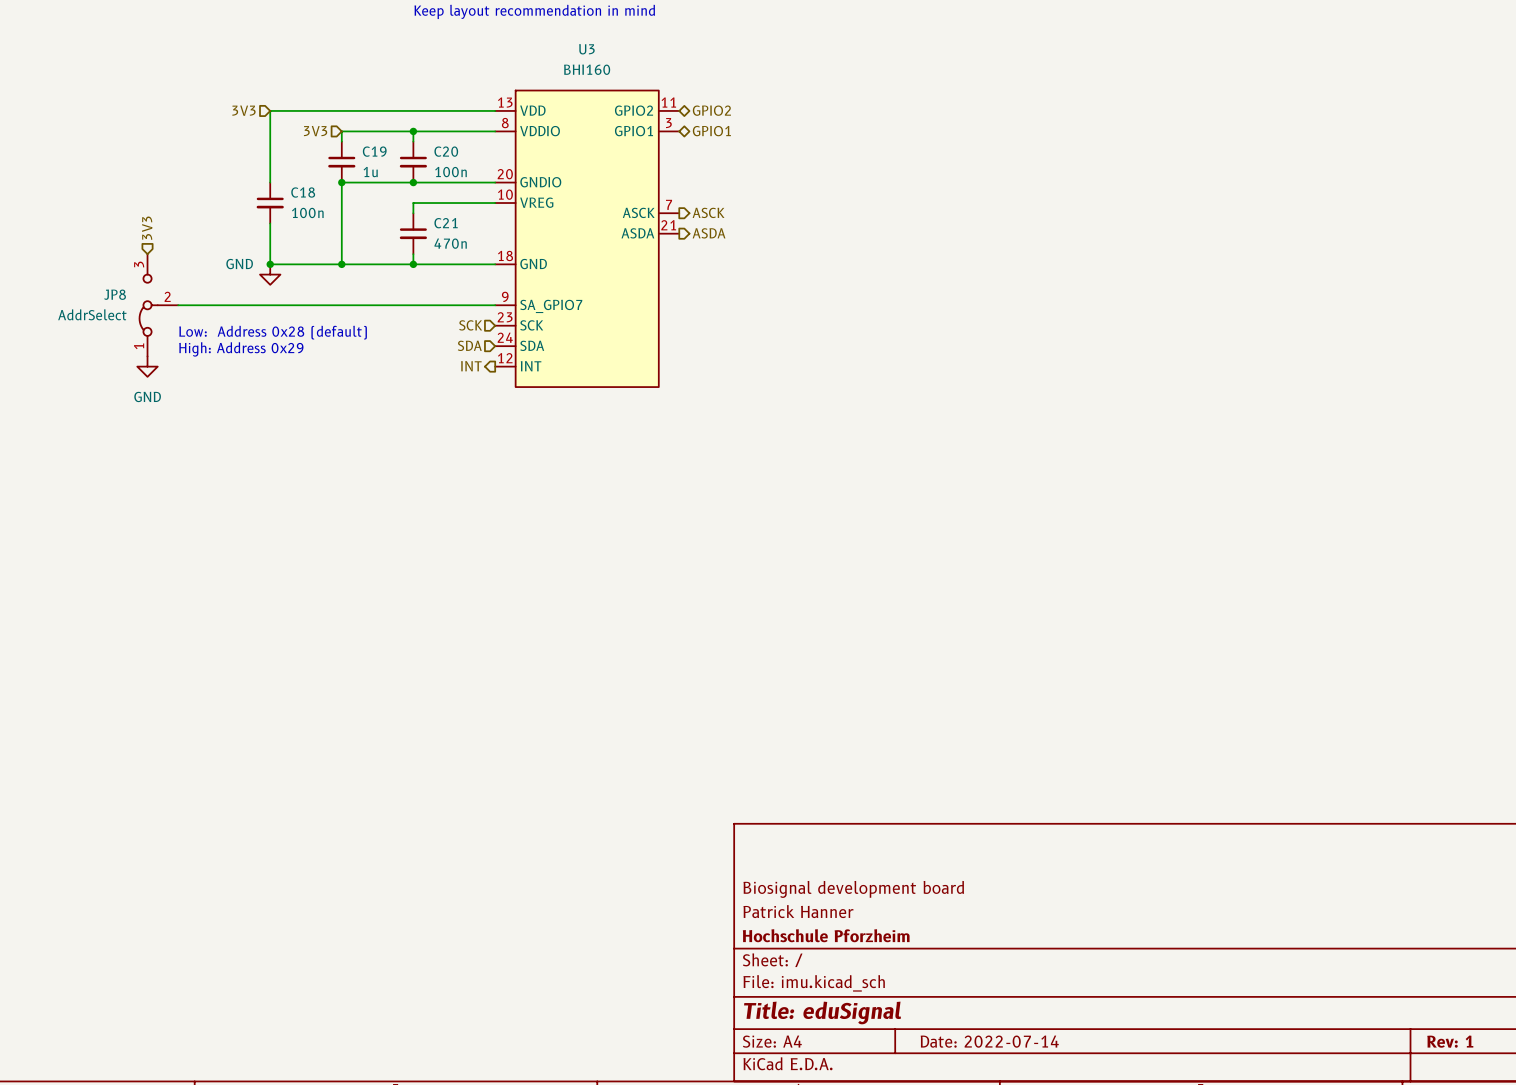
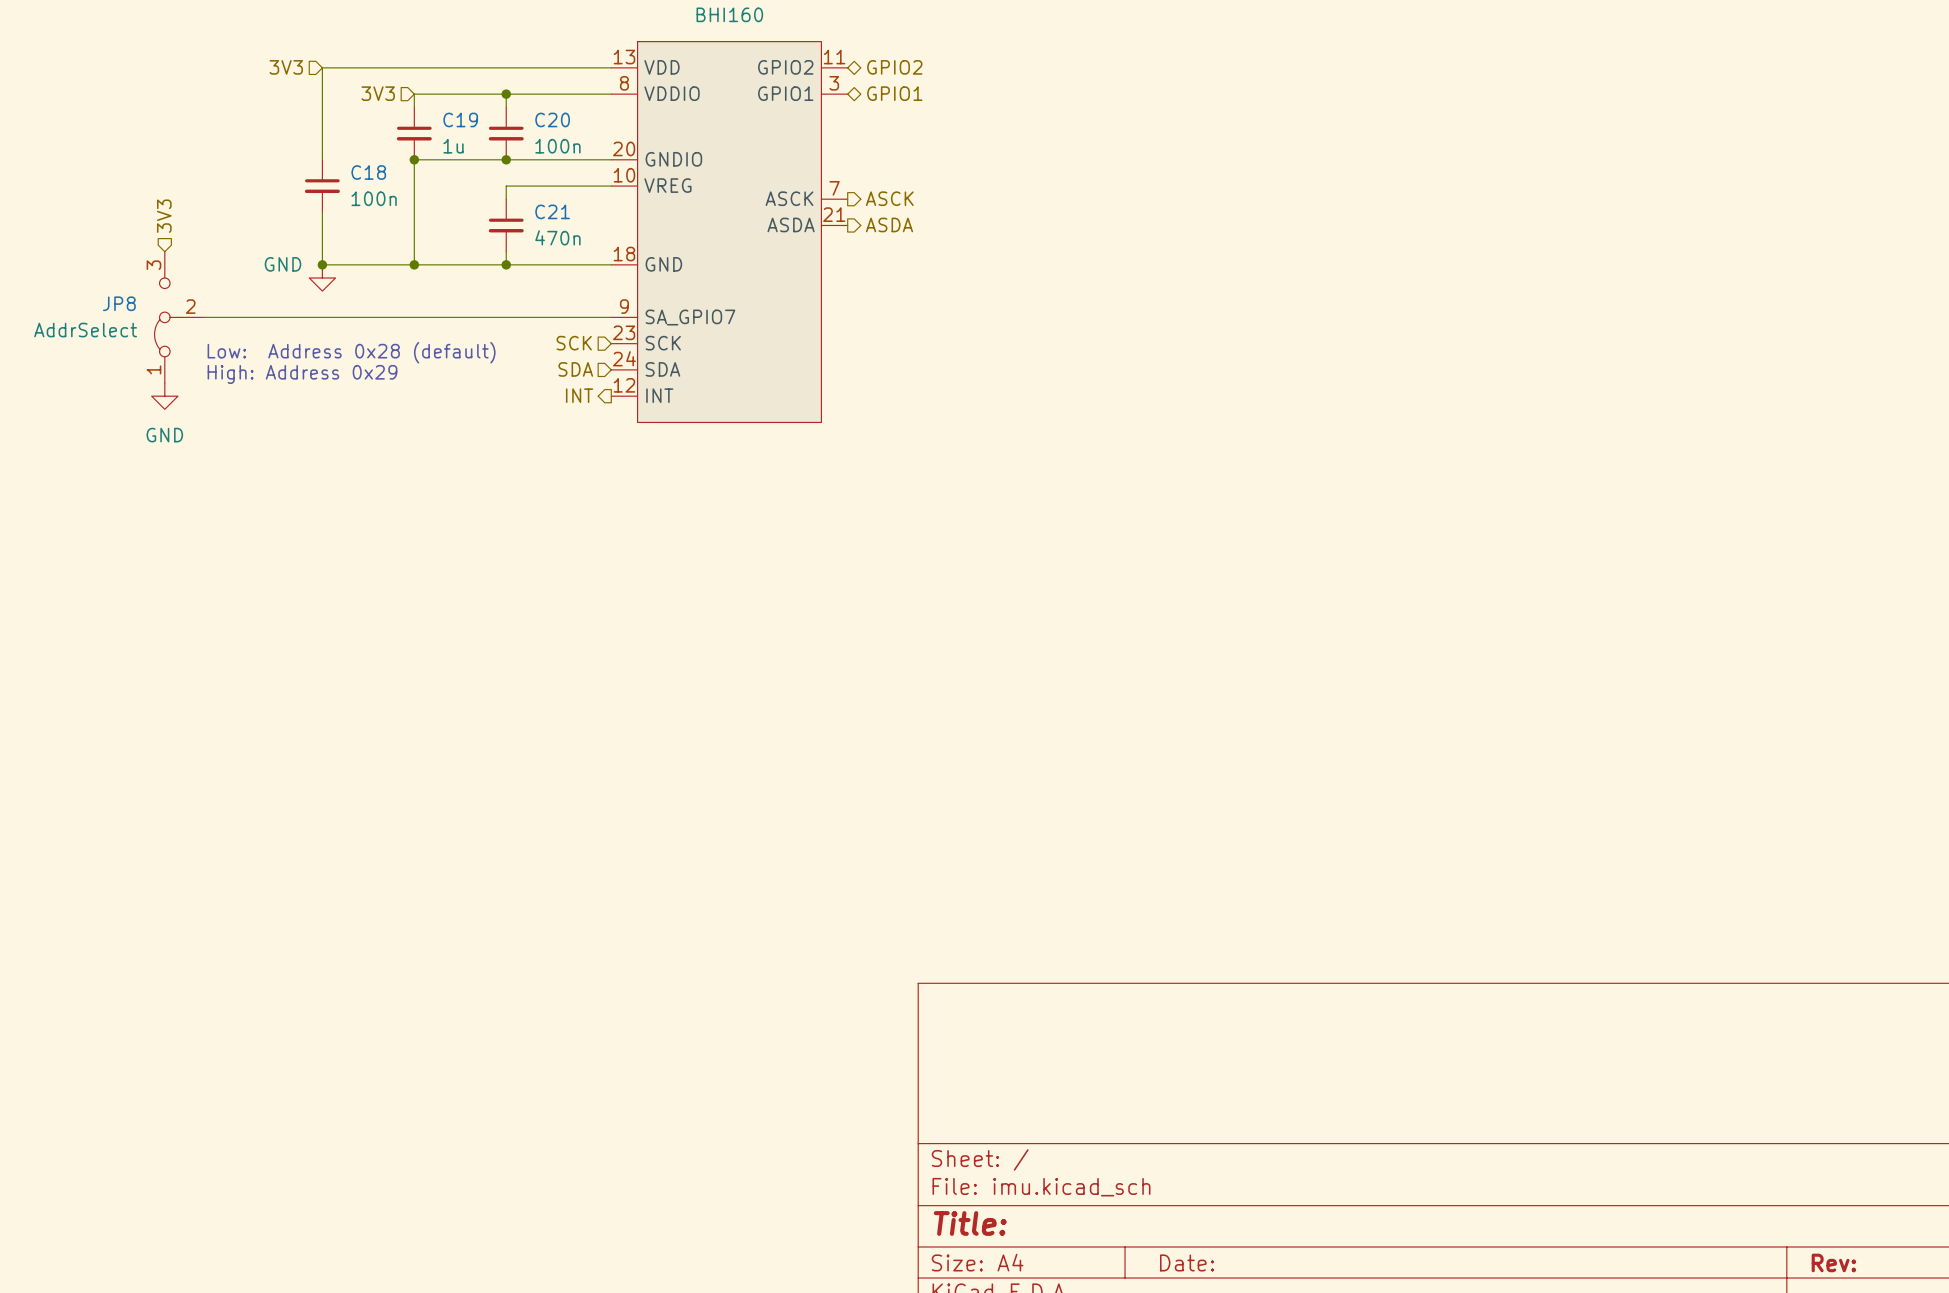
title block: Biosignal development board (853, 889) -> none
title block: Patrick Hanner (798, 911) -> none
title block: Hochschule Pforzheim (826, 935) -> none
title block: Title: eduSignal (822, 1012) -> Title: (970, 1223)
title block: Date: 2022-07-14 (989, 1041) -> Date: (1186, 1262)
title block: Rev: 1 (1450, 1041) -> Rev: (1833, 1262)

